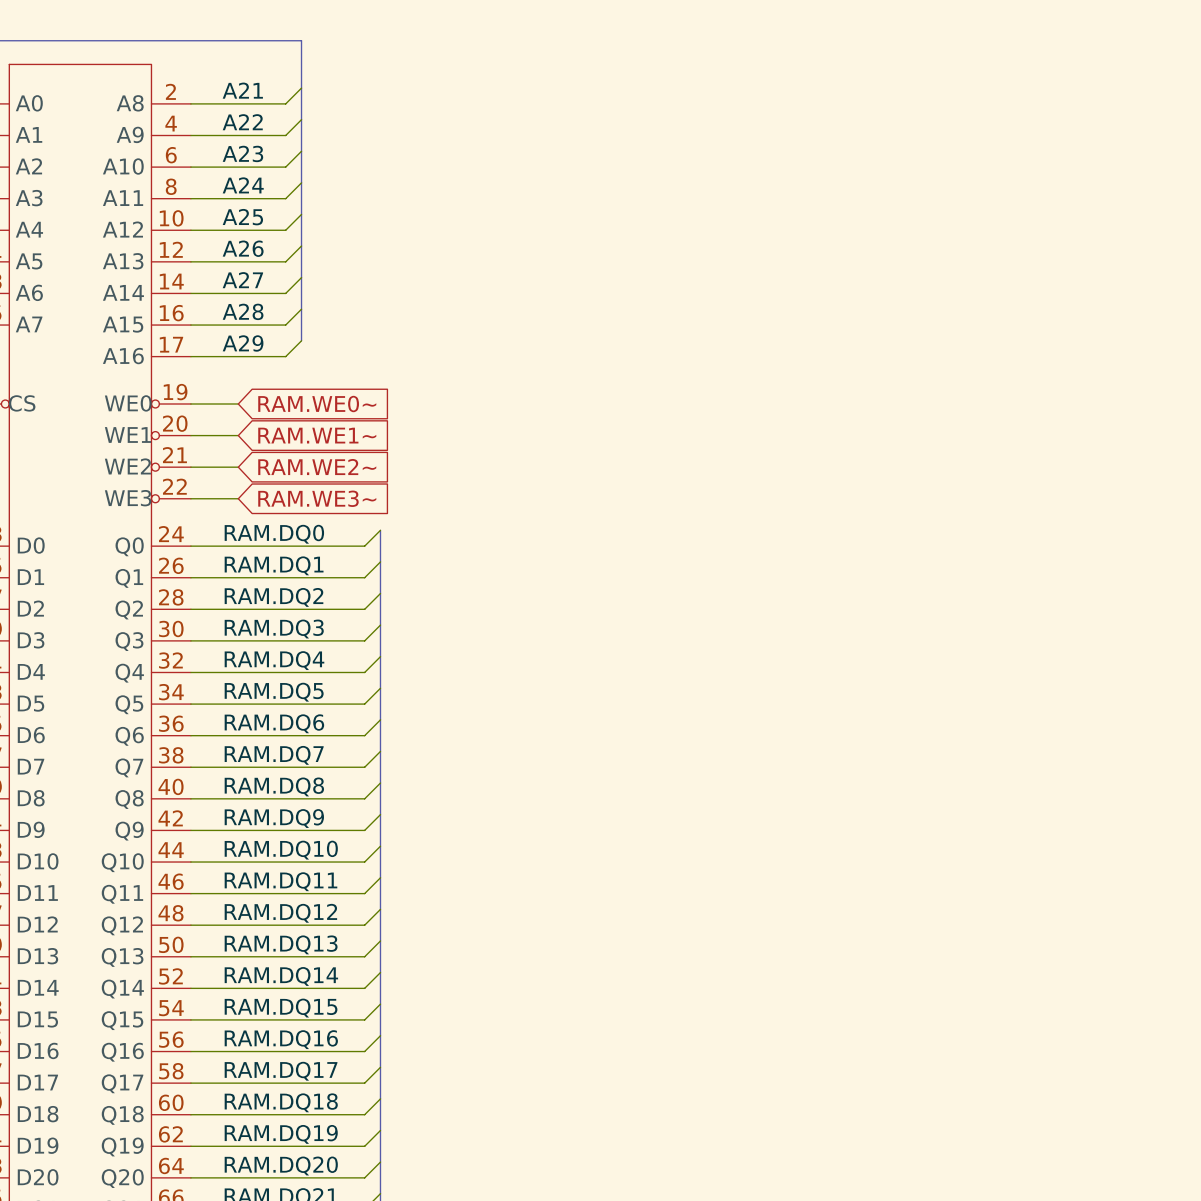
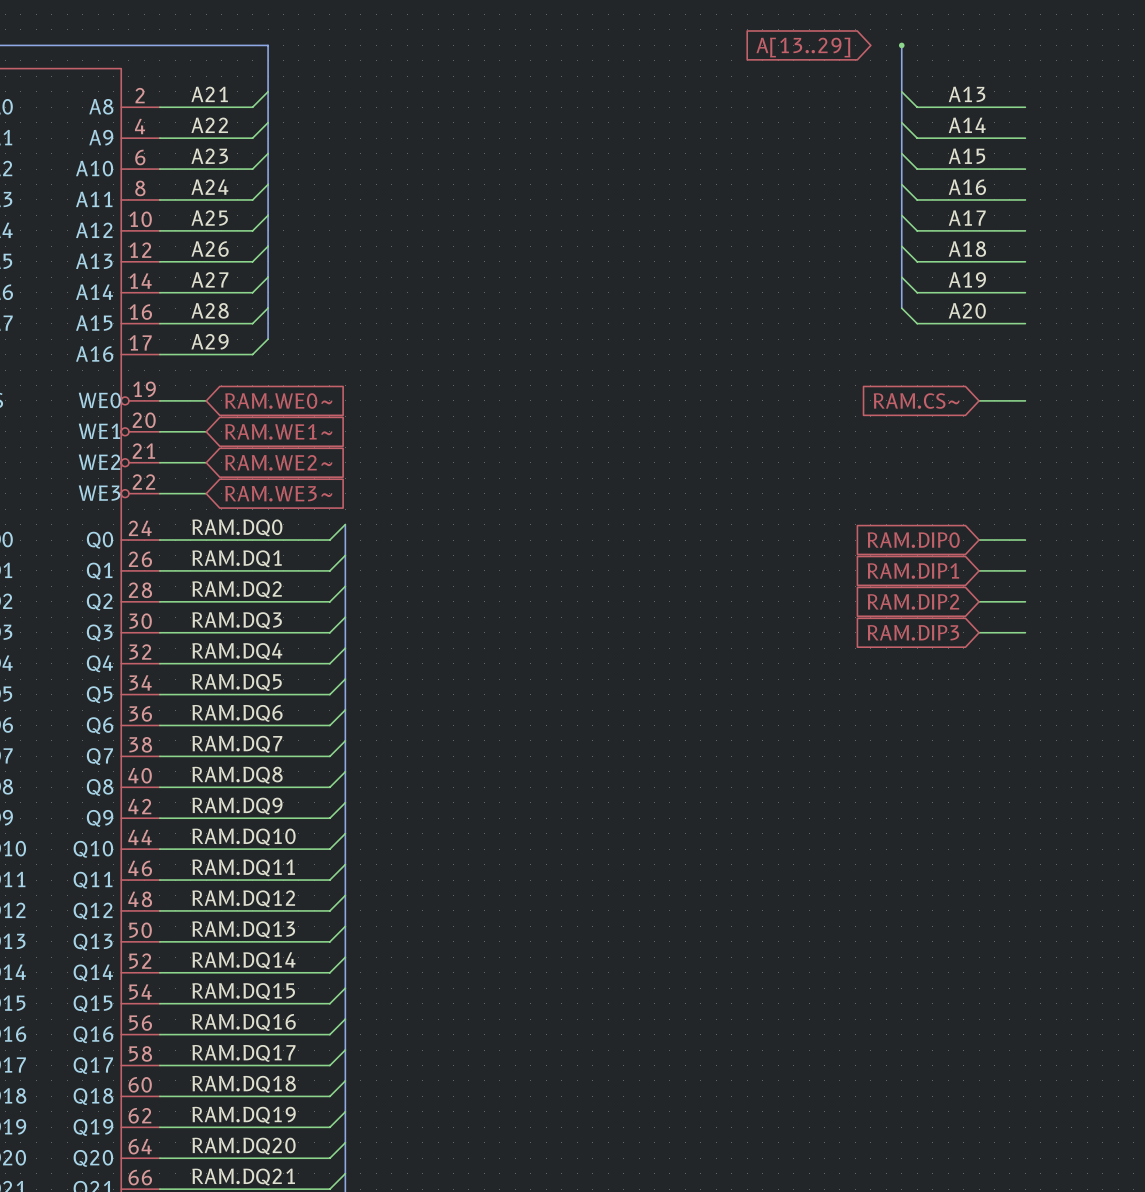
bus: none -> (901, 45) (901, 308)
junction: none -> (901, 45)
global label: none -> A[13..29] (803, 47)
wire: none -> (901, 91) (917, 107) (1025, 107)
label: none -> A13 (967, 94)
wire: none -> (901, 122) (917, 138) (1025, 138)
label: none -> A14 (967, 125)
wire: none -> (901, 153) (917, 169) (1025, 169)
label: none -> A15 (966, 156)
wire: none -> (901, 184) (917, 199) (1025, 199)
label: none -> A16 (967, 187)
wire: none -> (901, 215) (917, 230) (1025, 230)
label: none -> A17 (967, 218)
wire: none -> (901, 246) (917, 261) (1025, 261)
label: none -> A18 (967, 249)
wire: none -> (901, 277) (917, 292) (1025, 292)
label: none -> A19 (967, 279)
wire: none -> (901, 308) (917, 323) (1025, 323)
label: none -> A20 (967, 310)
wire: none -> (979, 400) (1025, 400)
global label: none -> RAM.CS~ (916, 400)
global label: none -> RAM.DIP0 (913, 540)
wire: none -> (979, 540) (1025, 540)
global label: none -> RAM.DIP1 (913, 571)
wire: none -> (979, 570) (1025, 570)
global label: none -> RAM.DIP2 (913, 601)
wire: none -> (979, 601) (1025, 601)
global label: none -> RAM.DIP3 (913, 632)
wire: none -> (979, 632) (1025, 632)

